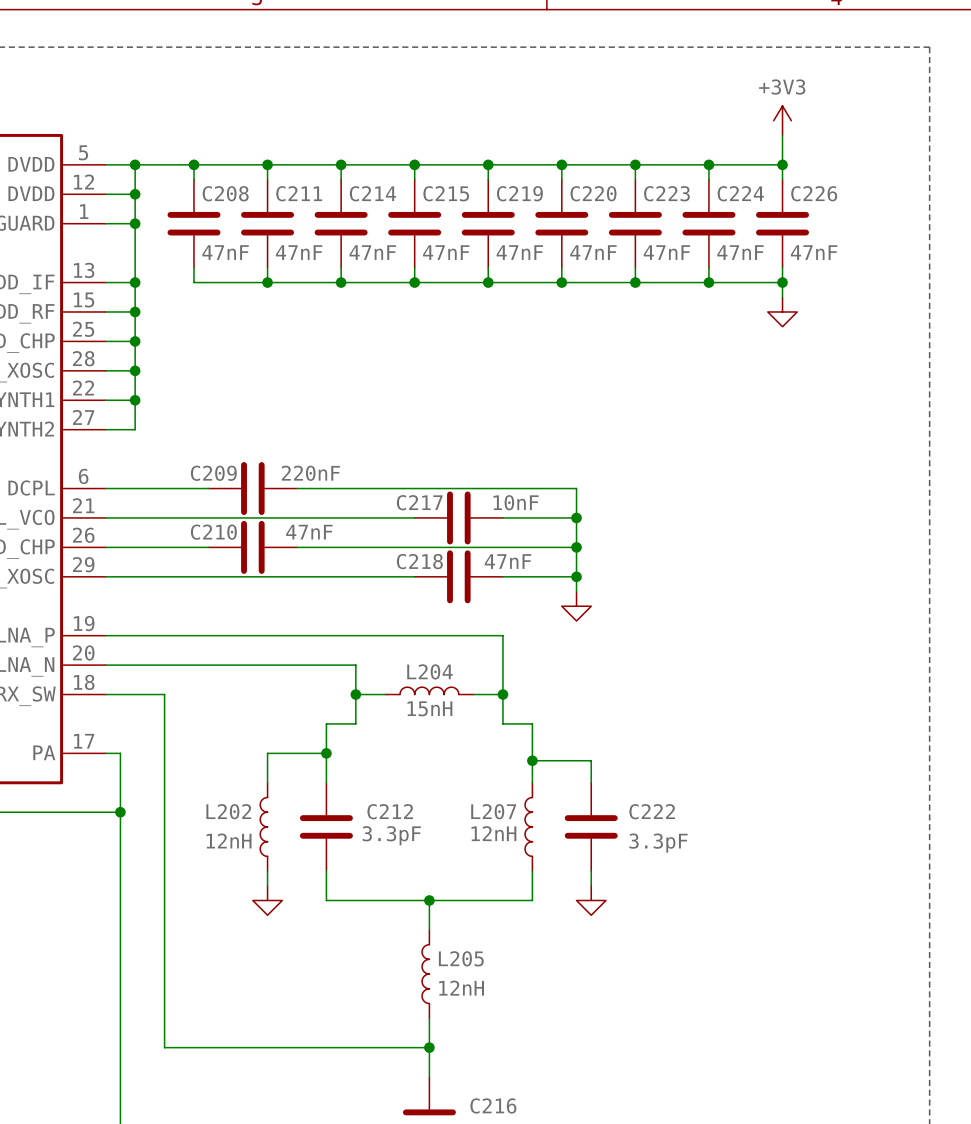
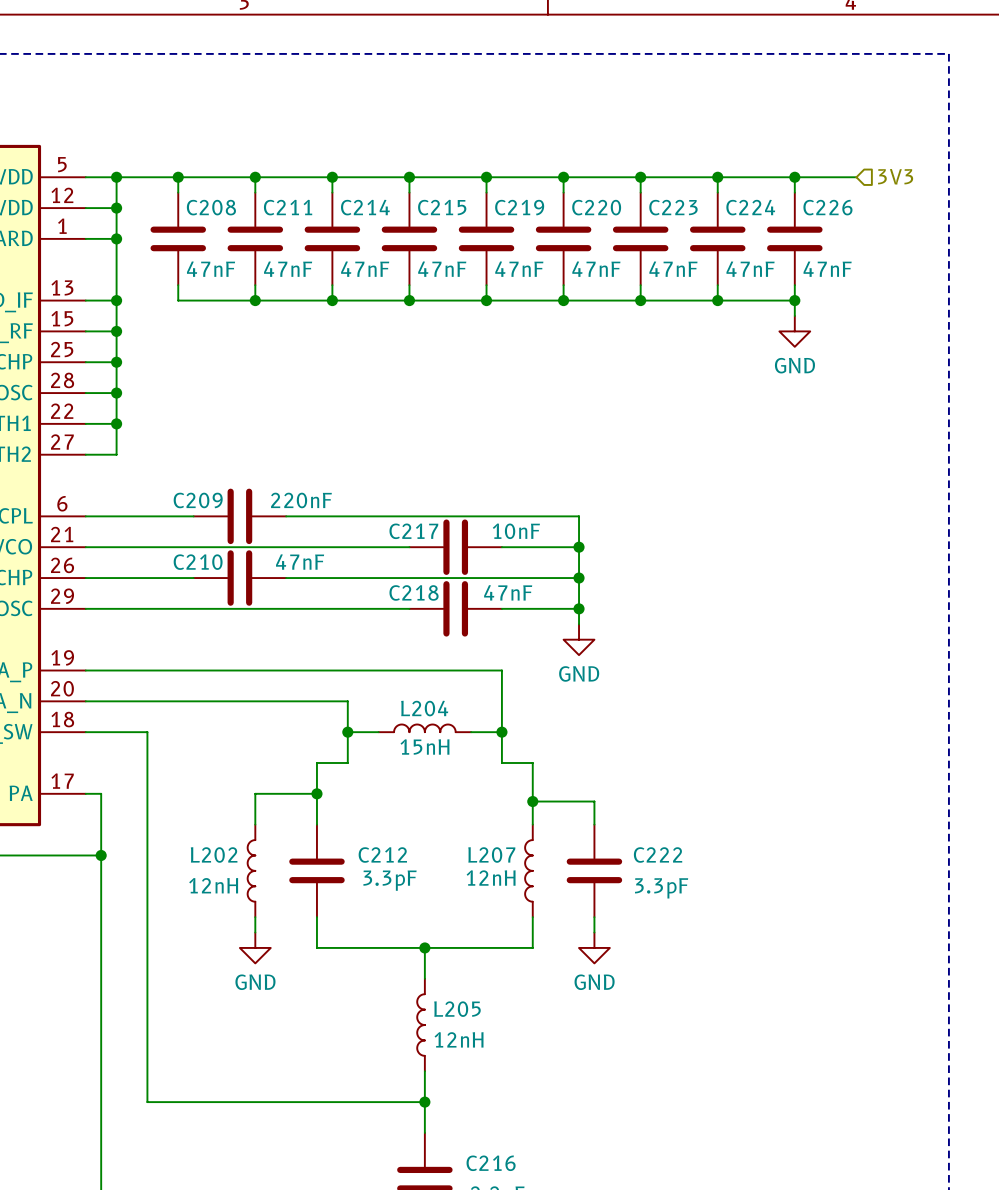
power symbol: +3V3 (782, 120) -> none
wire: (782, 135) (782, 164) -> (856, 177) (794, 177)
hierarchical label: none -> 3V3 (895, 176)
power symbol text: none -> GND (794, 365)
power symbol text: none -> GND (579, 673)
power symbol text: none -> GND (255, 982)
power symbol text: none -> GND (594, 982)

